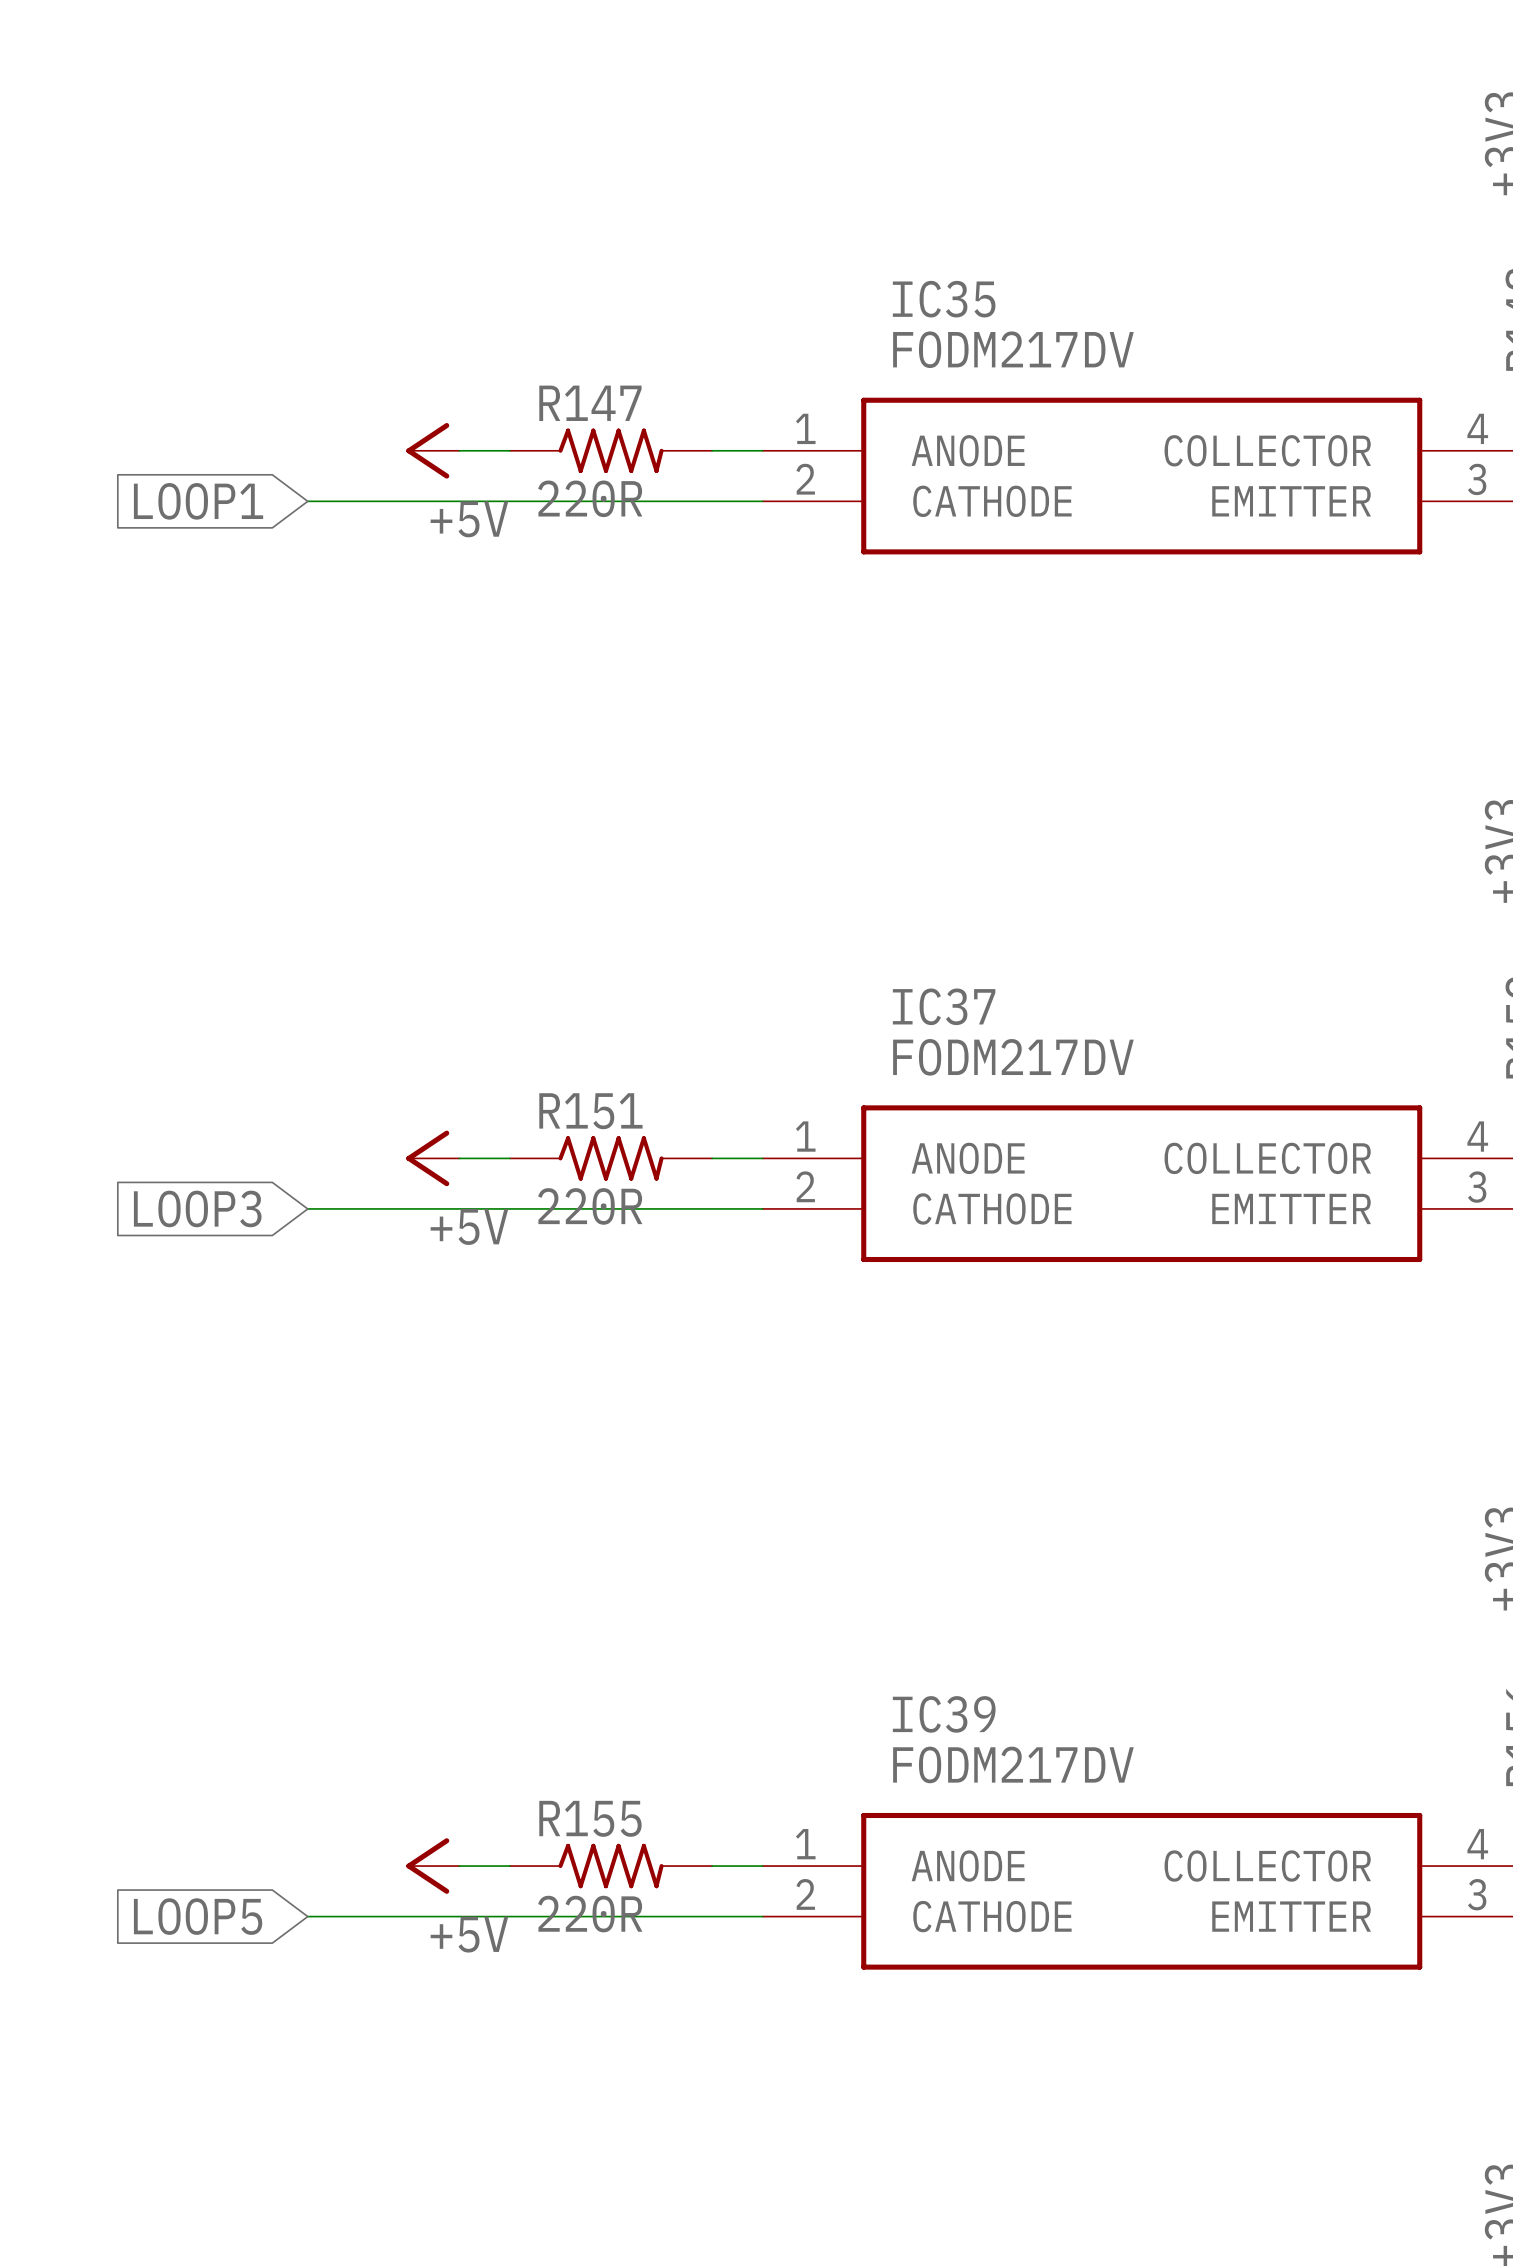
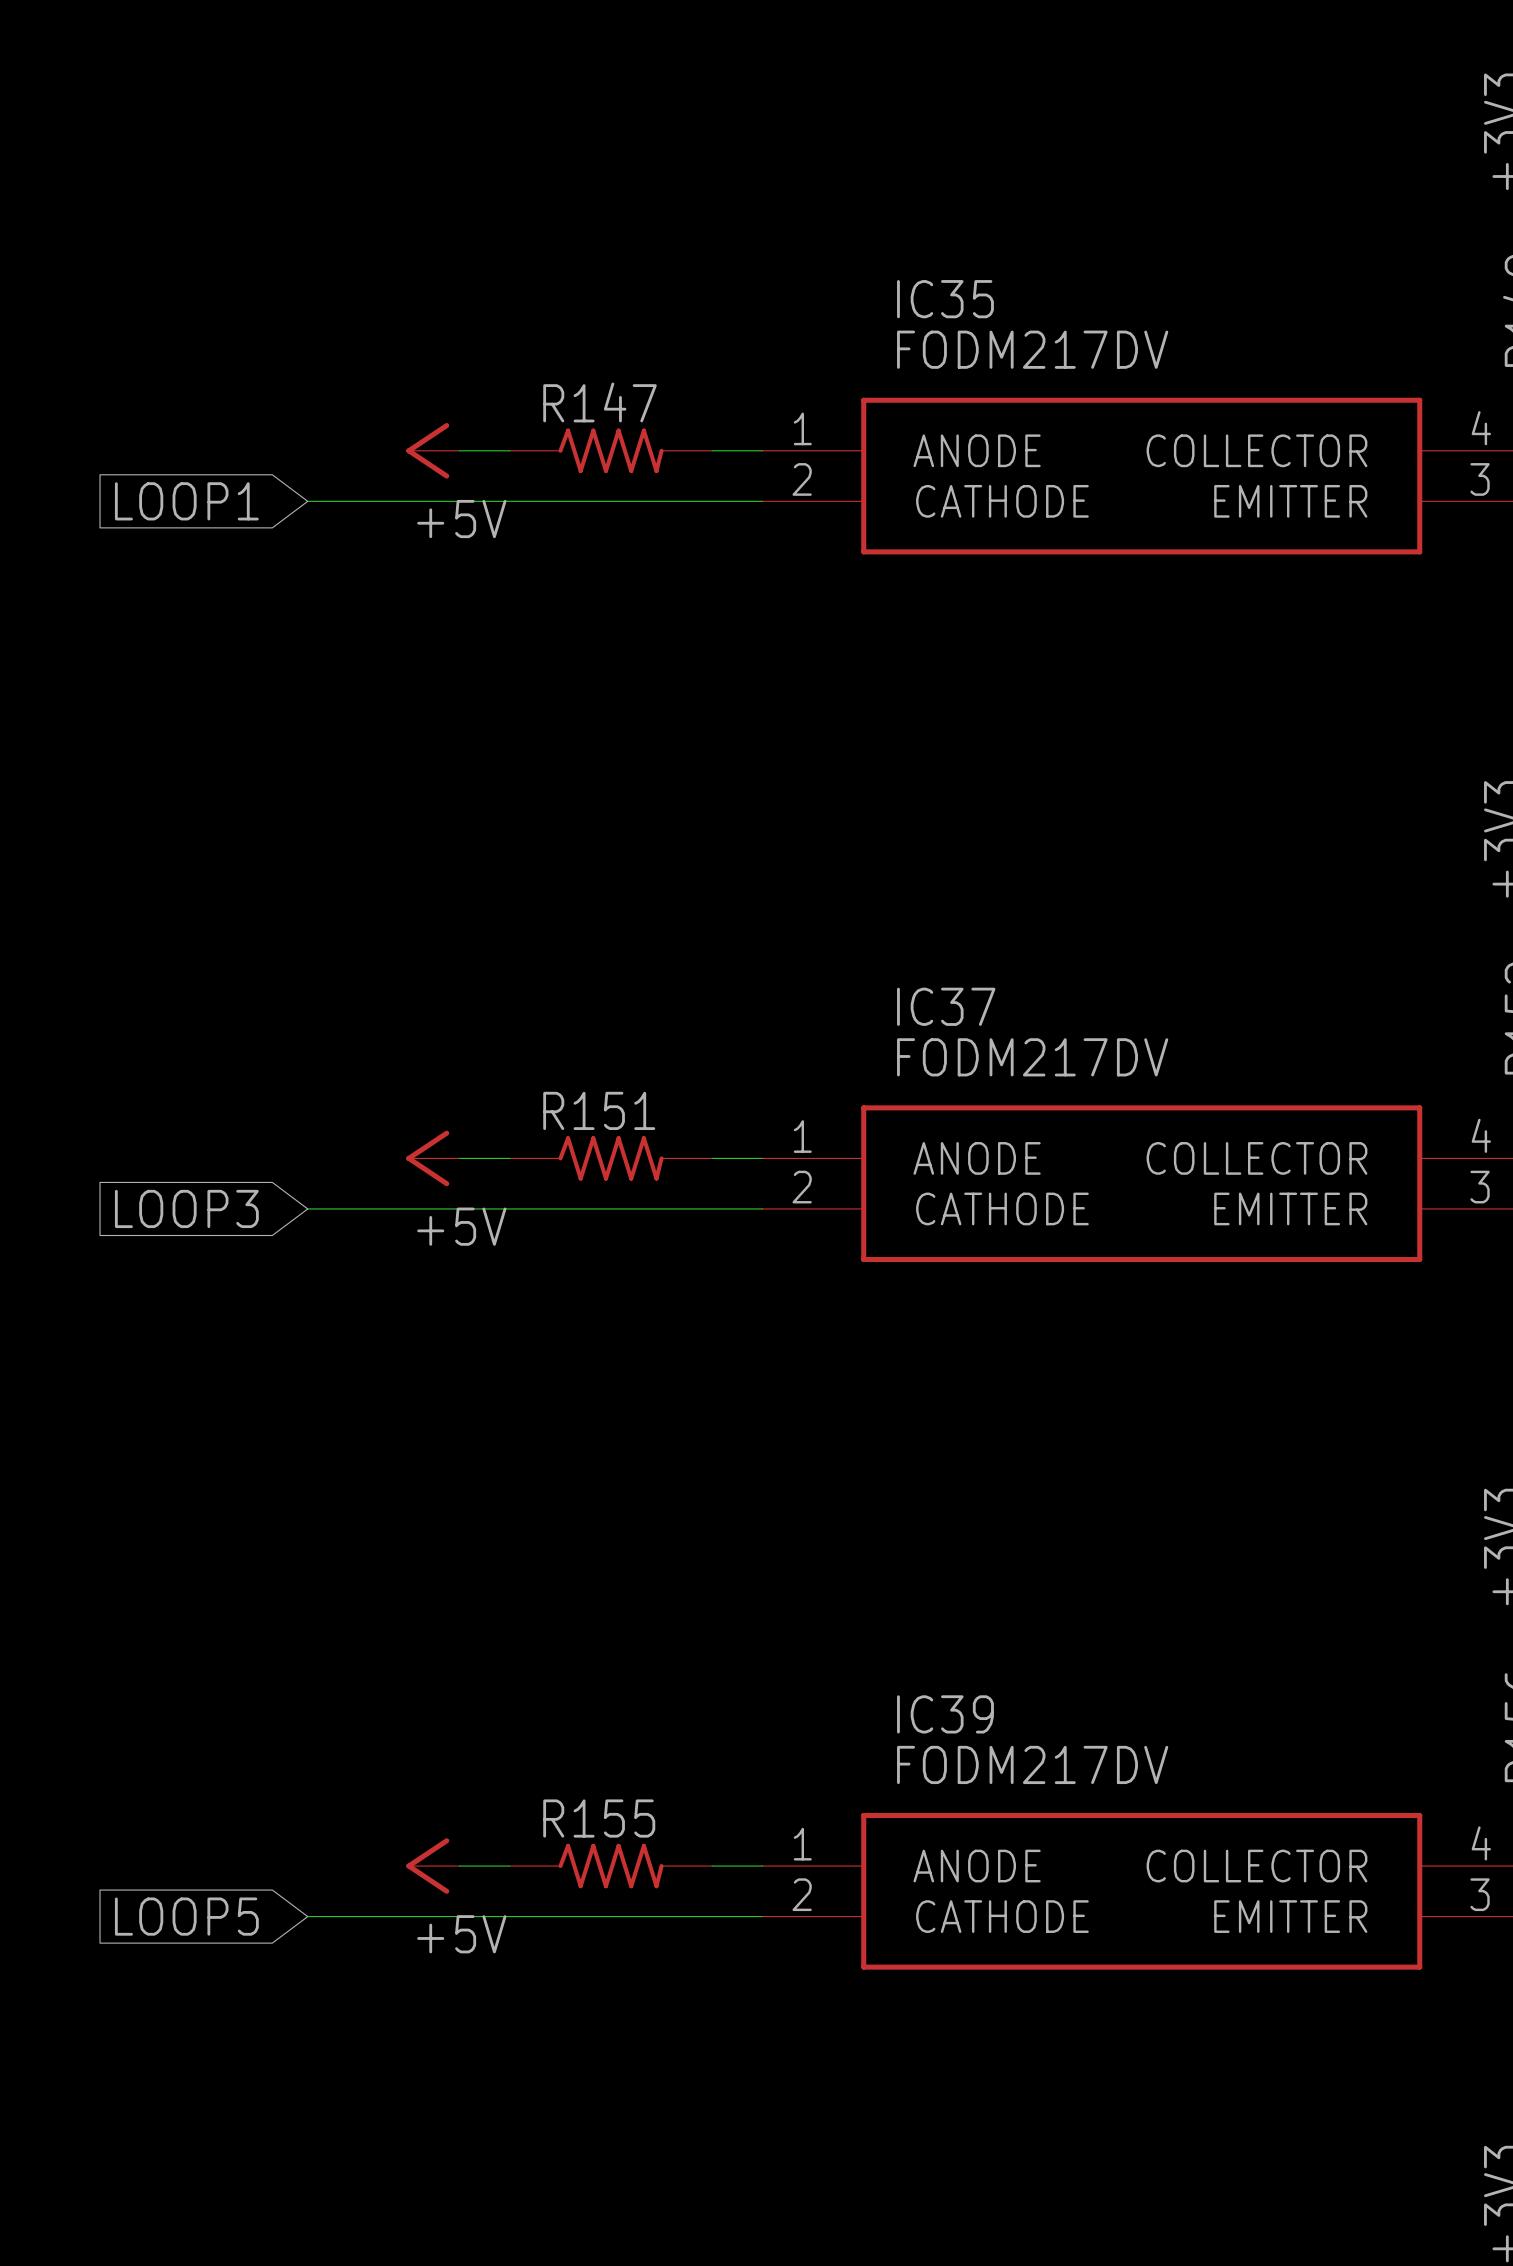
R147 value: 220R (590, 498) -> none
R151 value: 220R (590, 1206) -> none
R155 value: 220R (590, 1914) -> none

